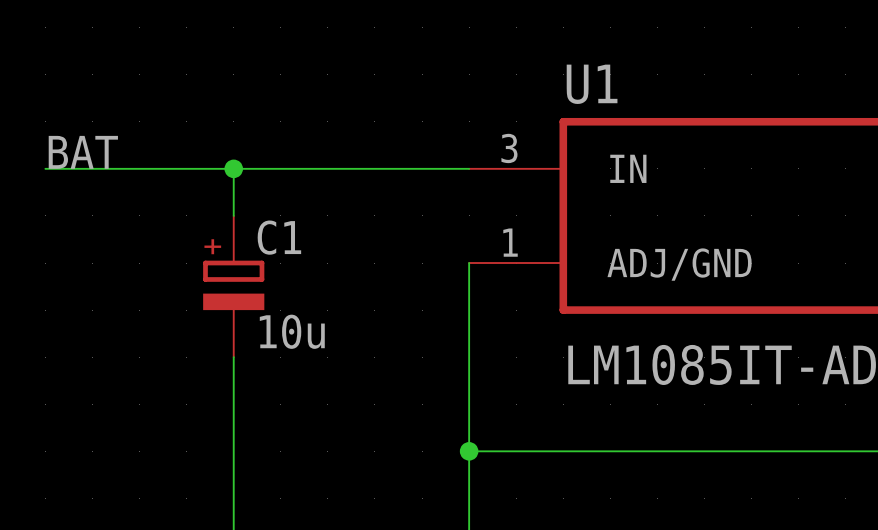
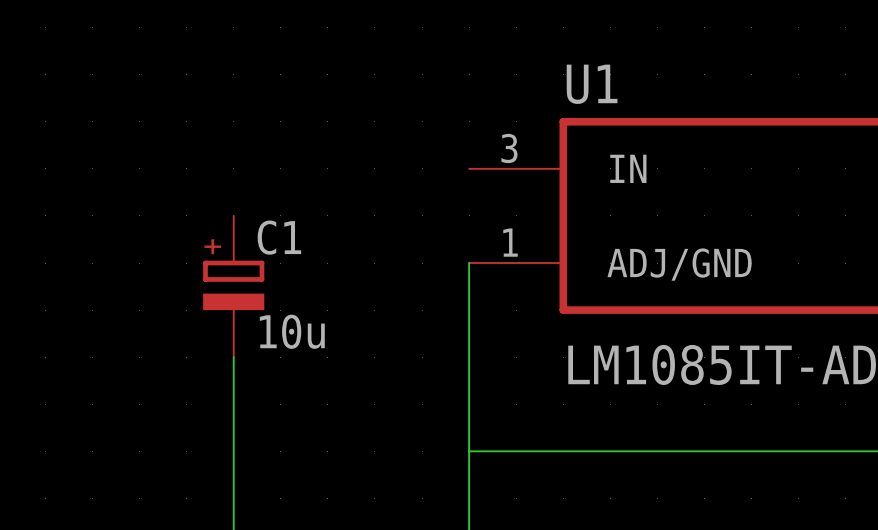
label: BAT (83, 152) -> none
wire: (45, 168) (469, 168) -> none
wire: (233, 168) (233, 215) -> none
junction: (233, 168) -> none
junction: (469, 451) -> none

